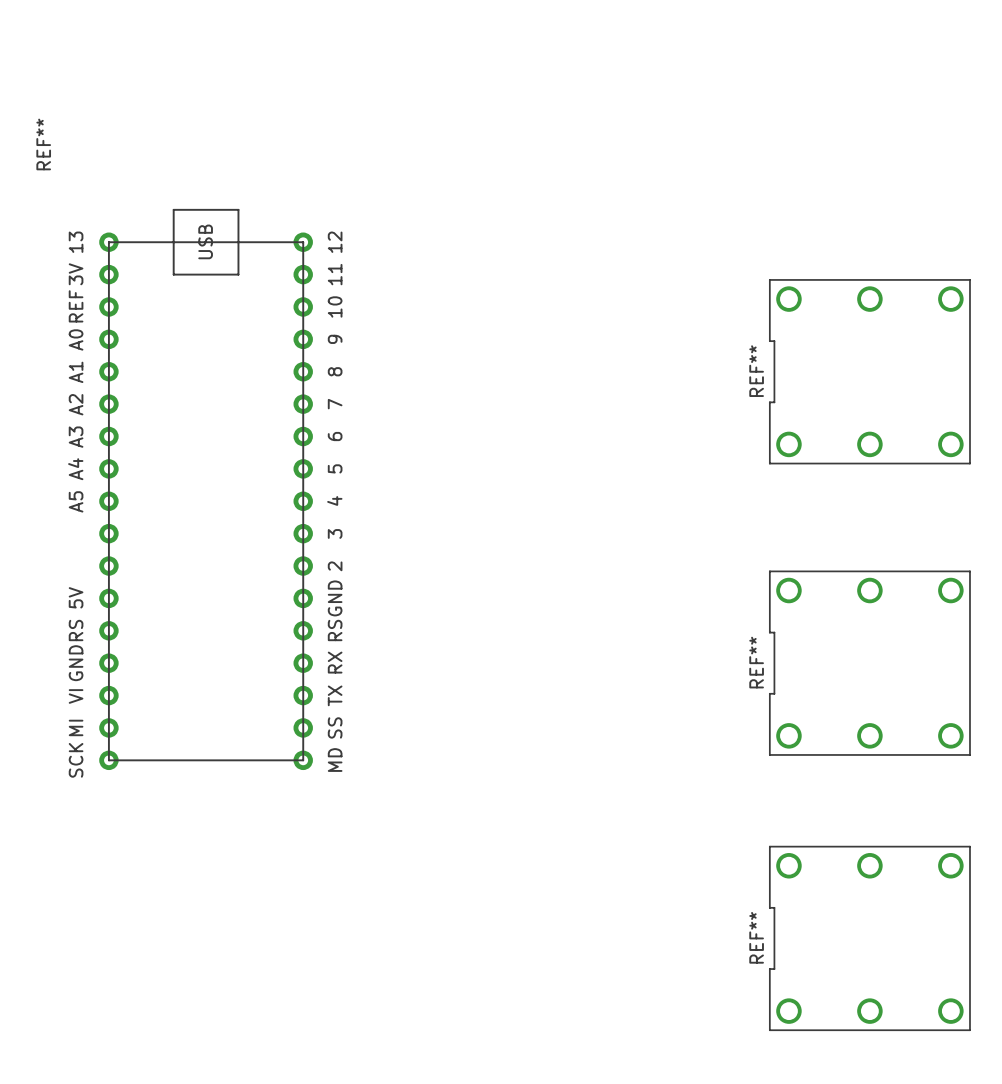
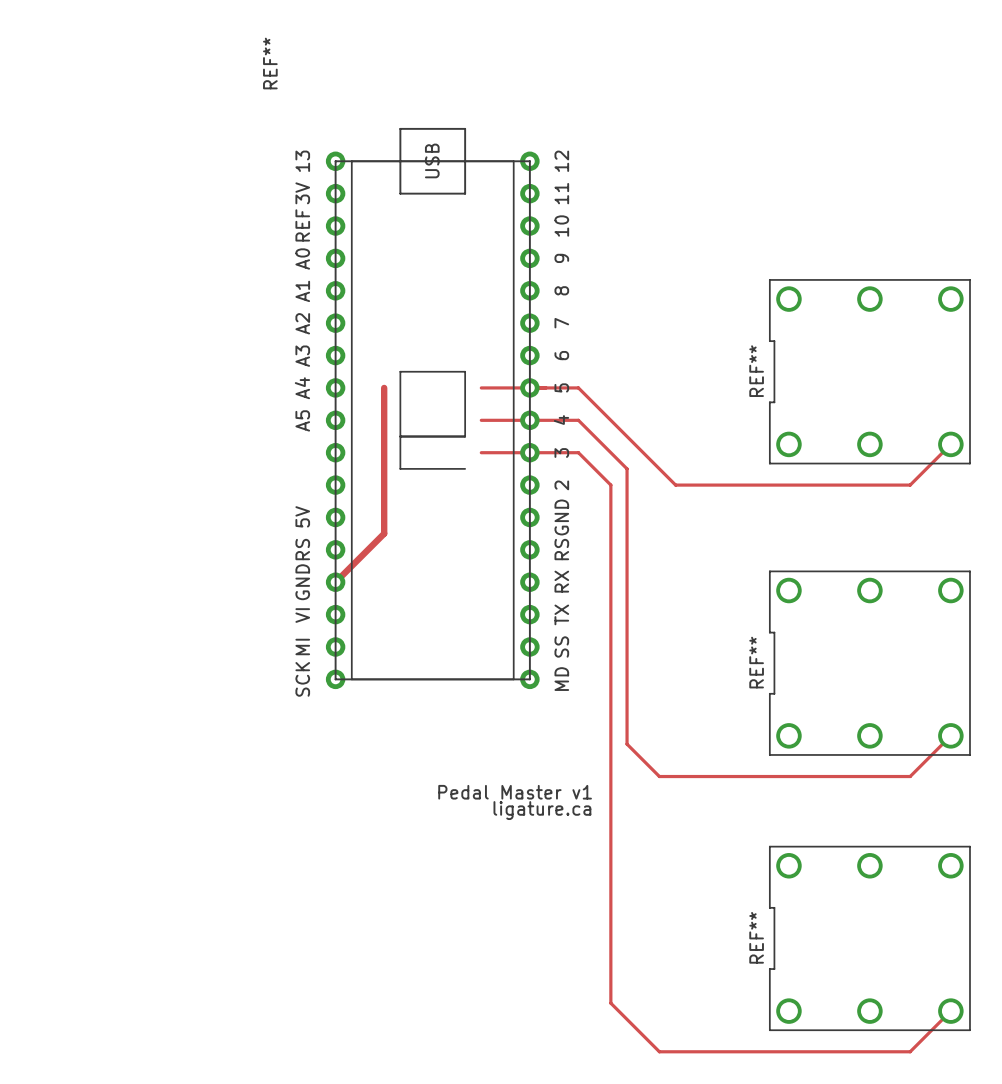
line: none -> (351, 161) (513, 161) (513, 679) (351, 679) (351, 161)
track: none -> (384, 387) (384, 533) (335, 582)
track: none -> (481, 387) (578, 387) (675, 485) (910, 485) (950, 444)
track: none -> (481, 420) (578, 420) (627, 468) (627, 744) (659, 776) (910, 776) (950, 735)
line: none -> (400, 436) (465, 436) (465, 371) (400, 371) (400, 468) (465, 468)
track: none -> (481, 452) (578, 452) (610, 485) (610, 1003) (659, 1051) (910, 1051) (950, 1011)
REF** position: (206, 489) -> (432, 408)
text: none -> Pedal Master v1 (515, 792)
text: none -> ligature.ca (542, 810)

